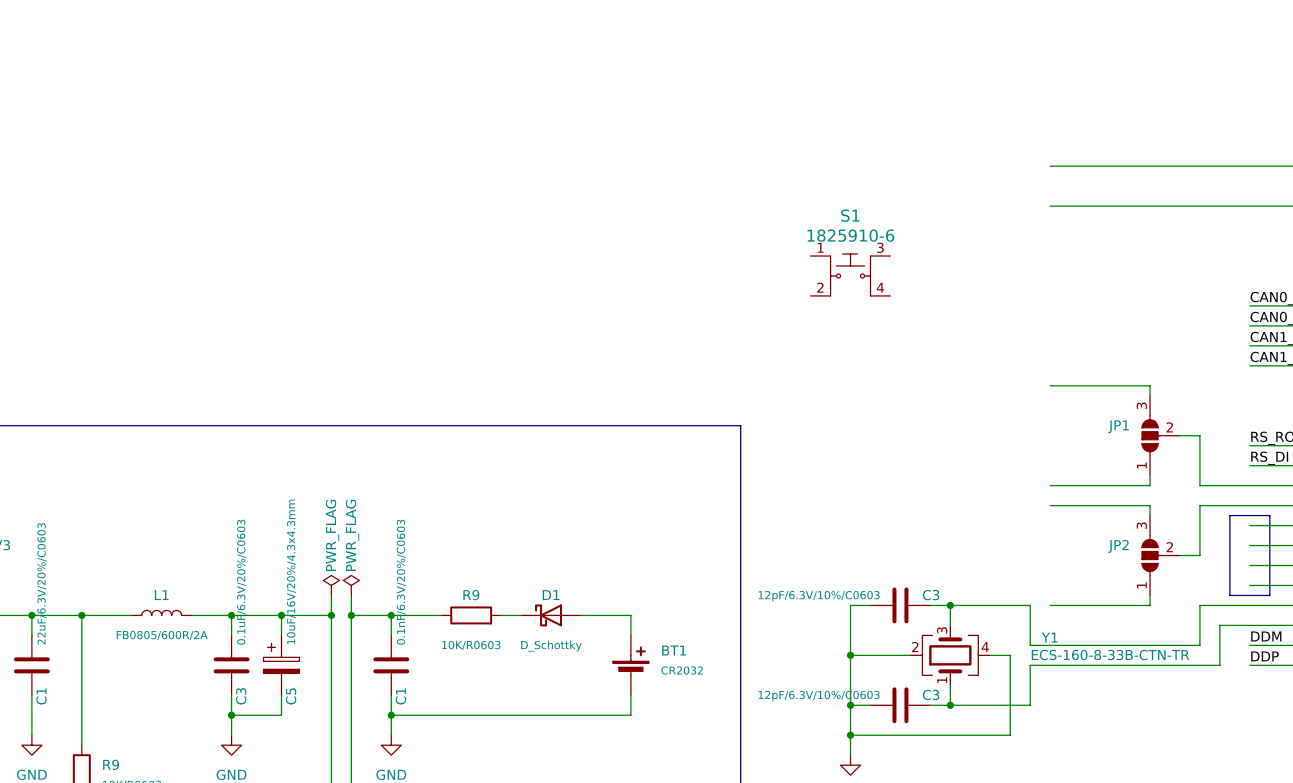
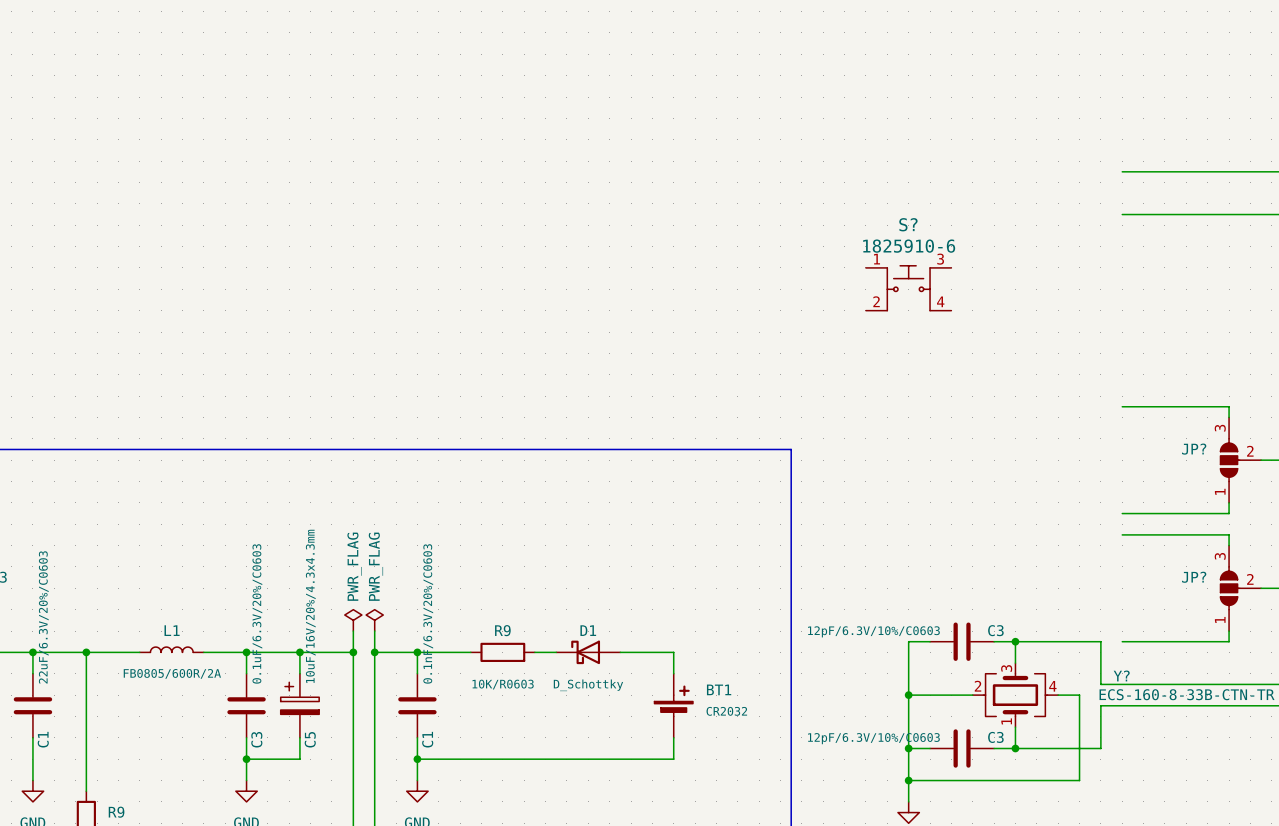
S1 name: S1 (850, 215) -> S? (908, 224)
JP1 name: JP1 (1118, 426) -> JP? (1194, 449)
JP2 name: JP2 (1118, 546) -> JP? (1194, 577)
Y1 name: Y1 (1049, 637) -> Y? (1121, 675)

